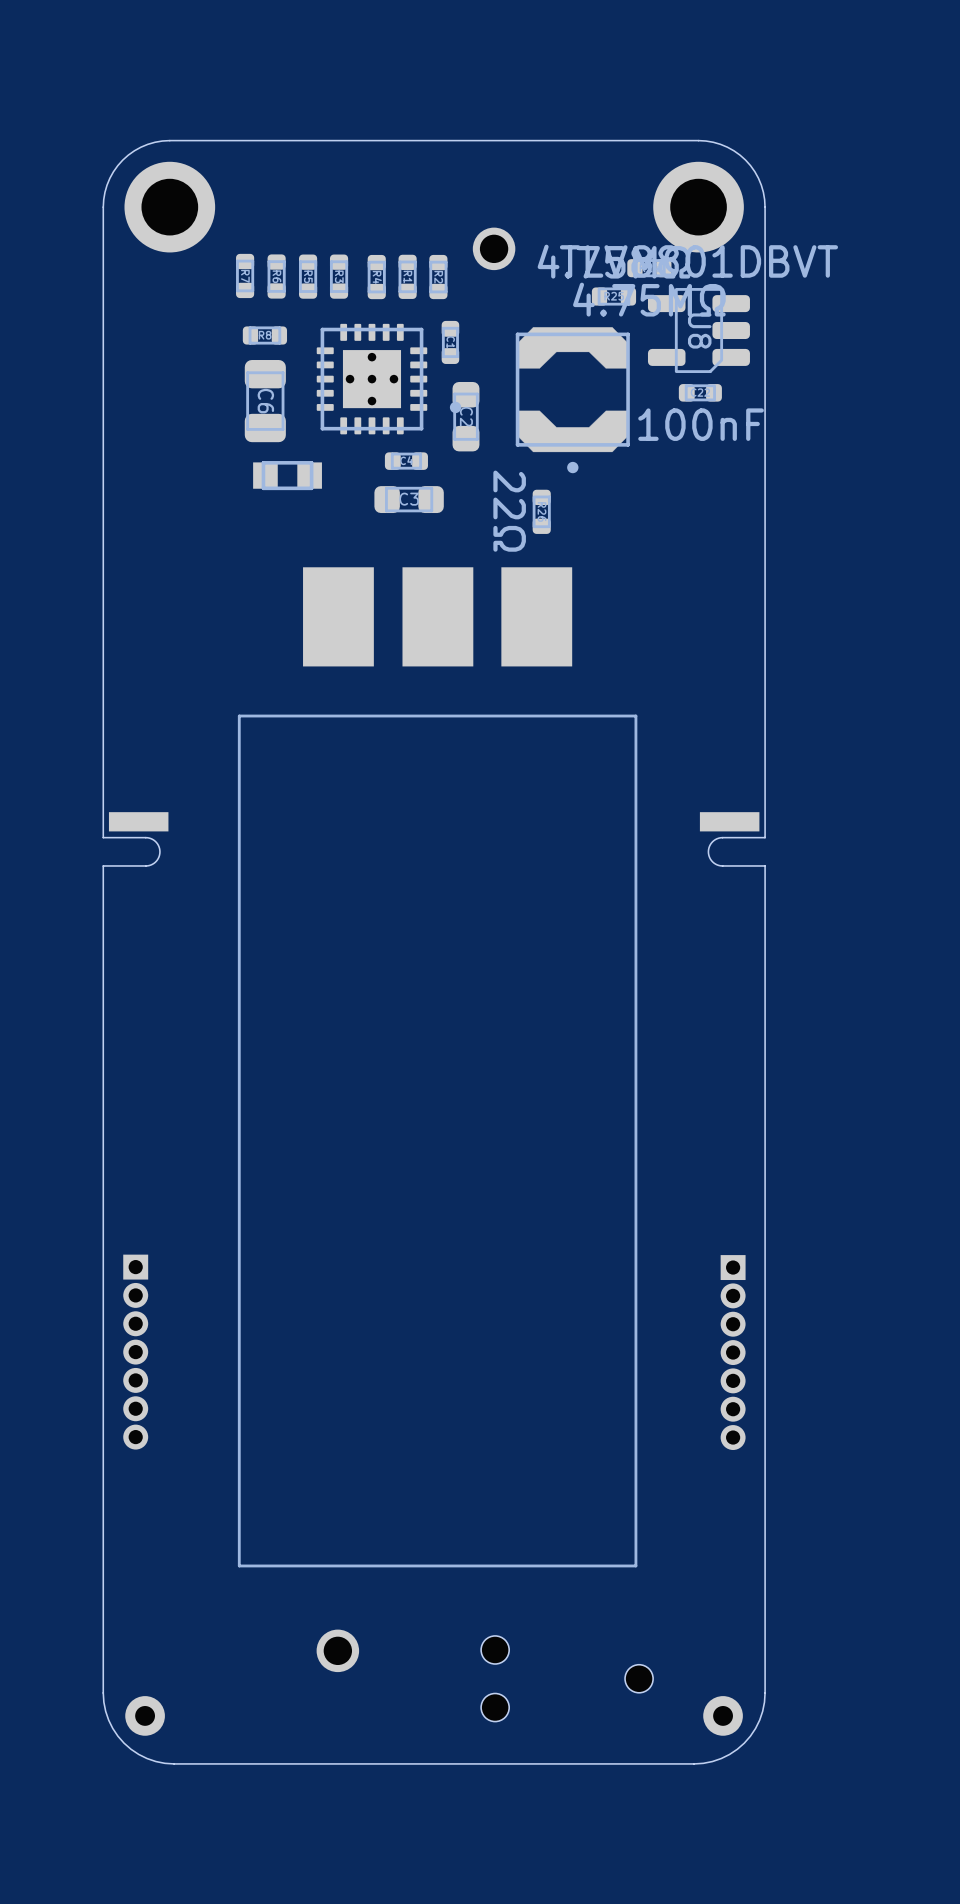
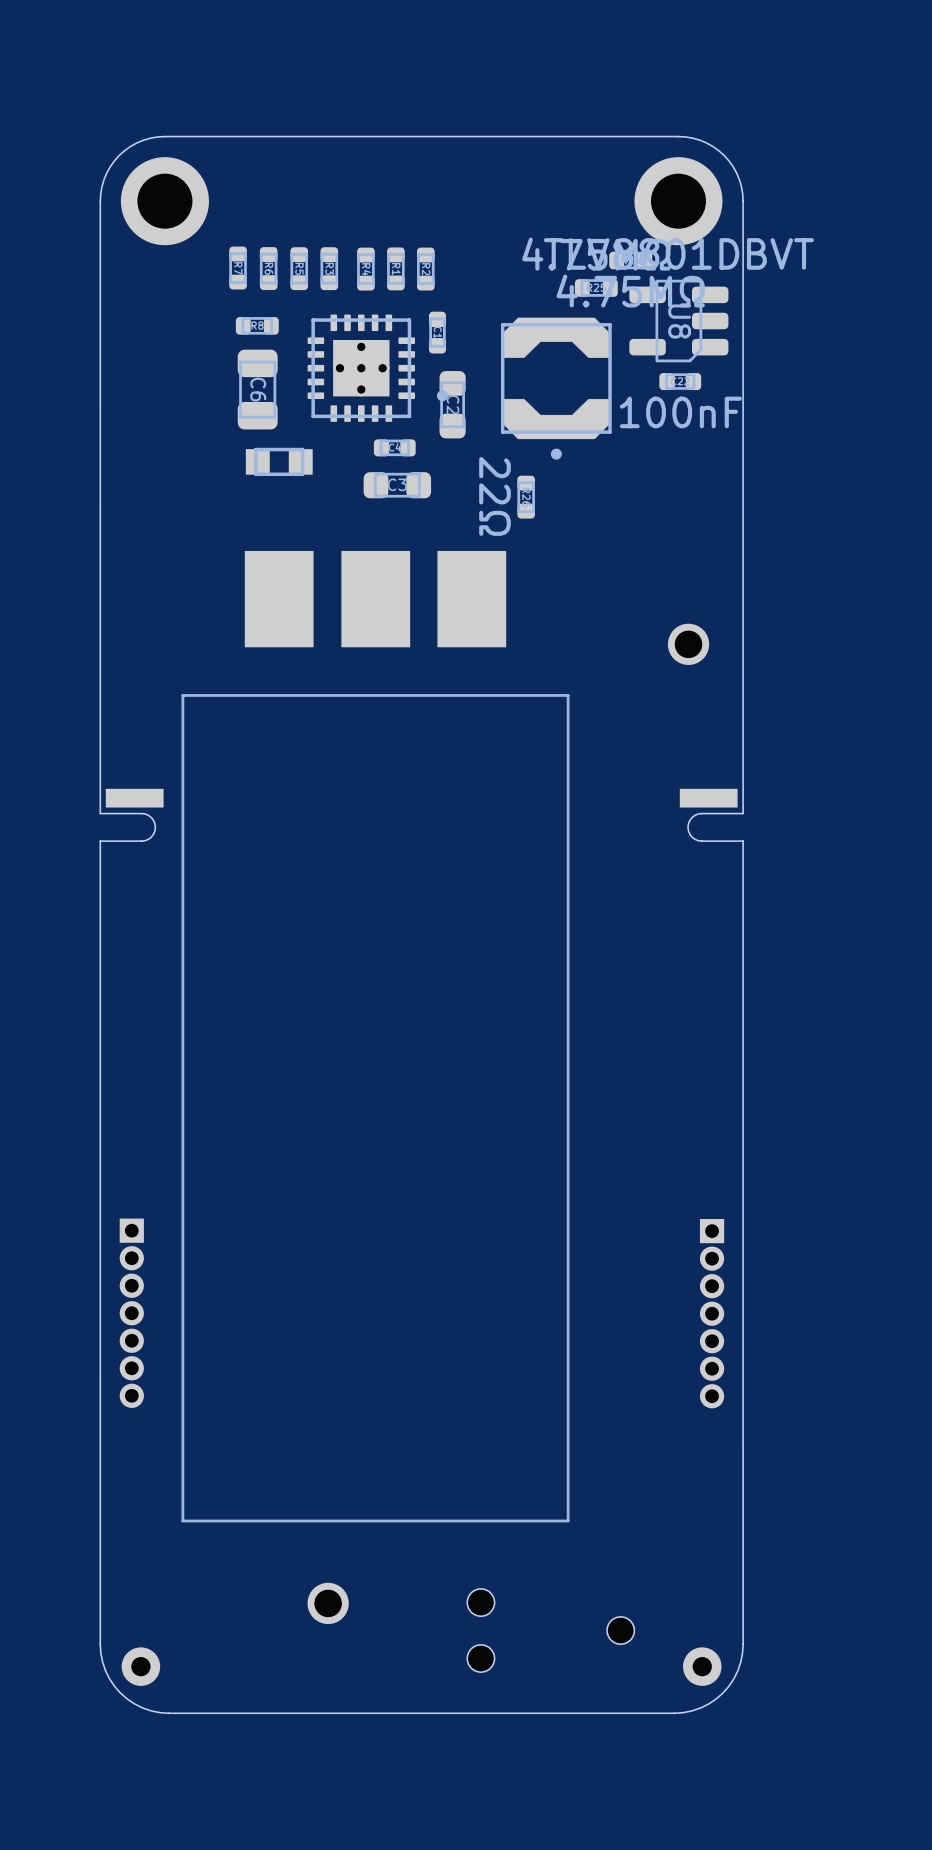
part position: (494, 248) -> (688, 644)
part position: (437, 1067) -> (375, 1036)

